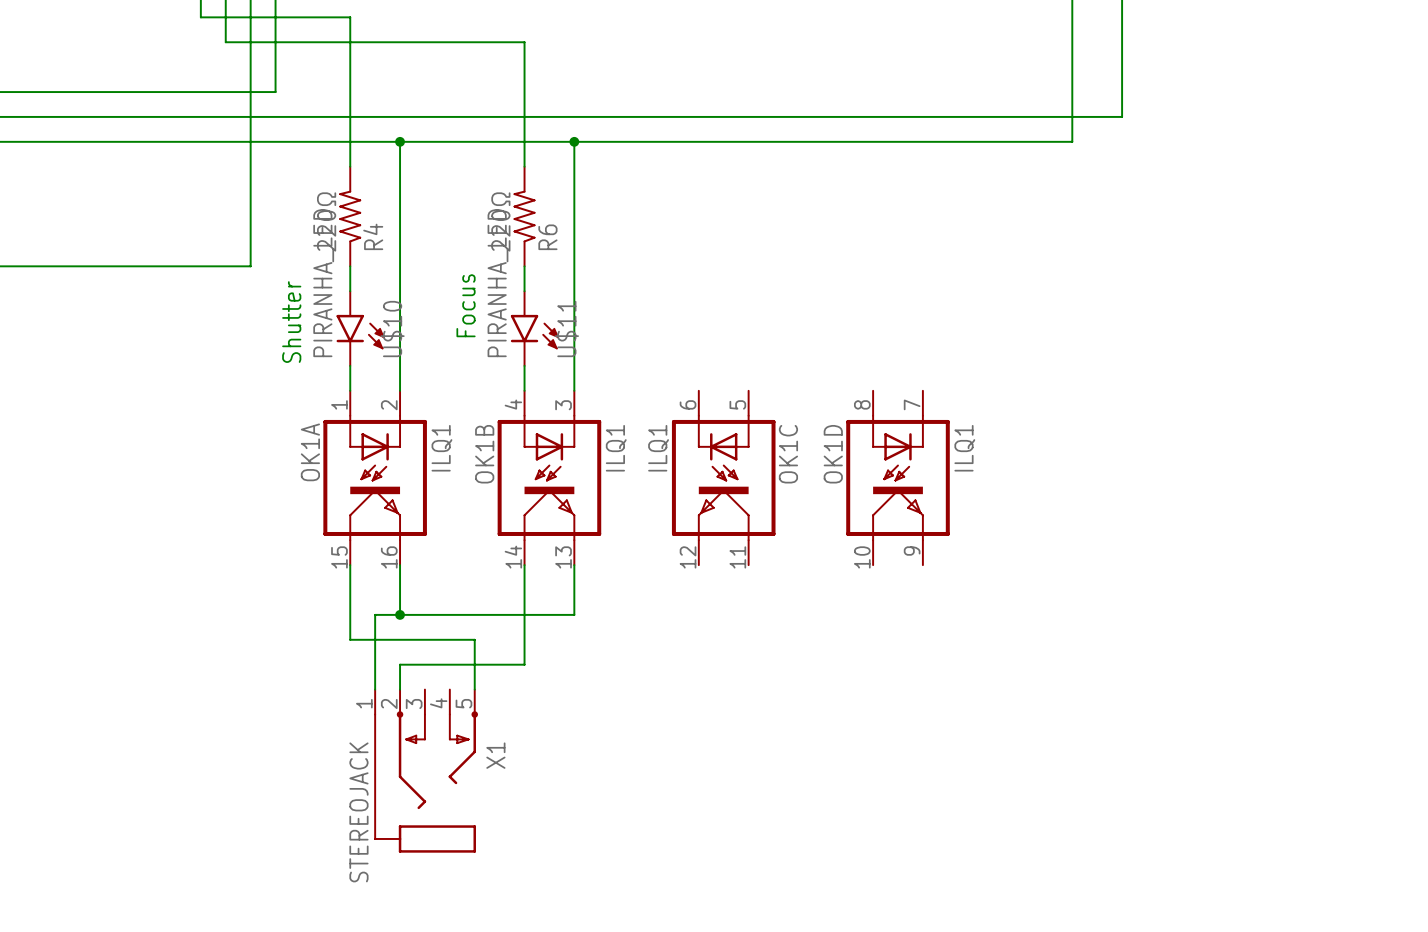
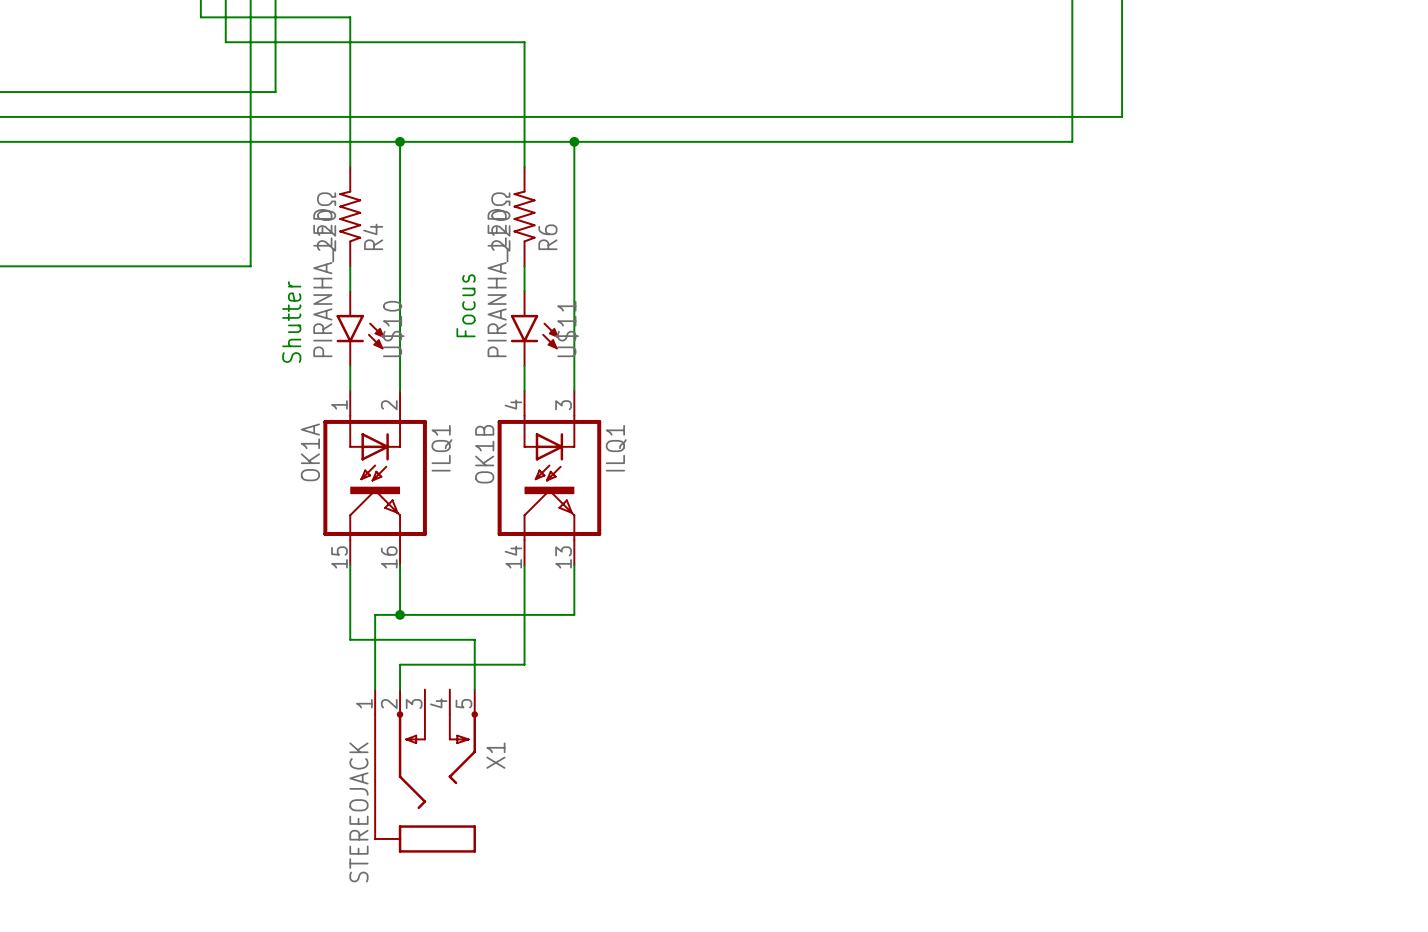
OK1C: ILQ1 (723, 477) -> none
OK1D: ILQ1 (898, 477) -> none

